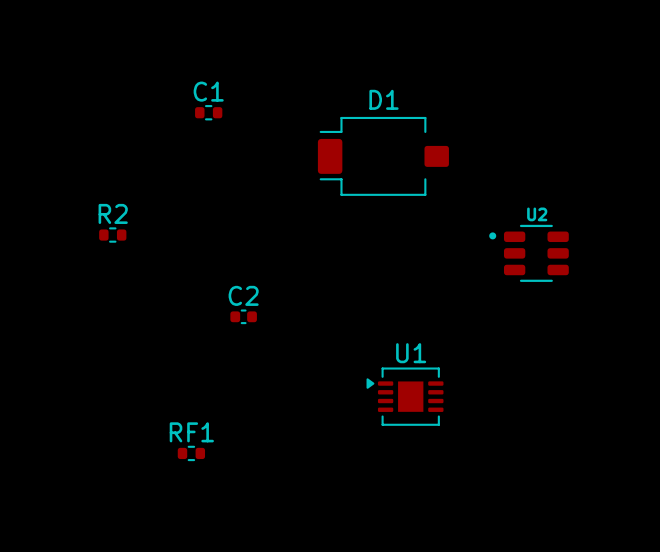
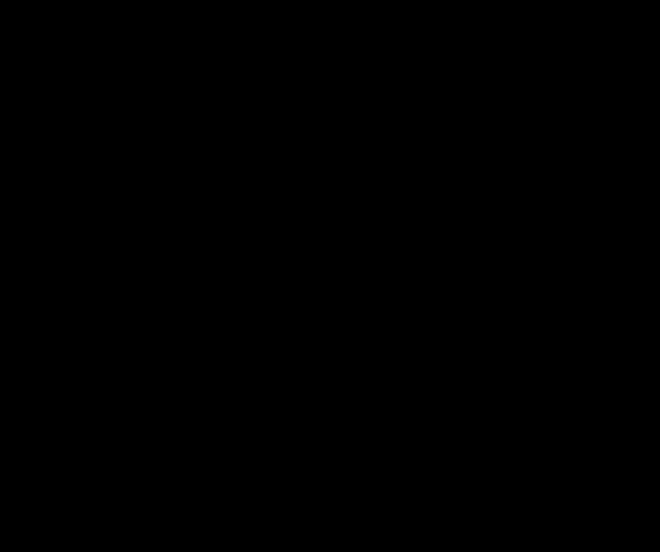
C1: (208, 112) -> none
D1: (383, 156) -> none
R2: (112, 235) -> none
U2: (529, 253) -> none
C2: (243, 316) -> none
U1: (405, 396) -> none
RF1: (191, 453) -> none

